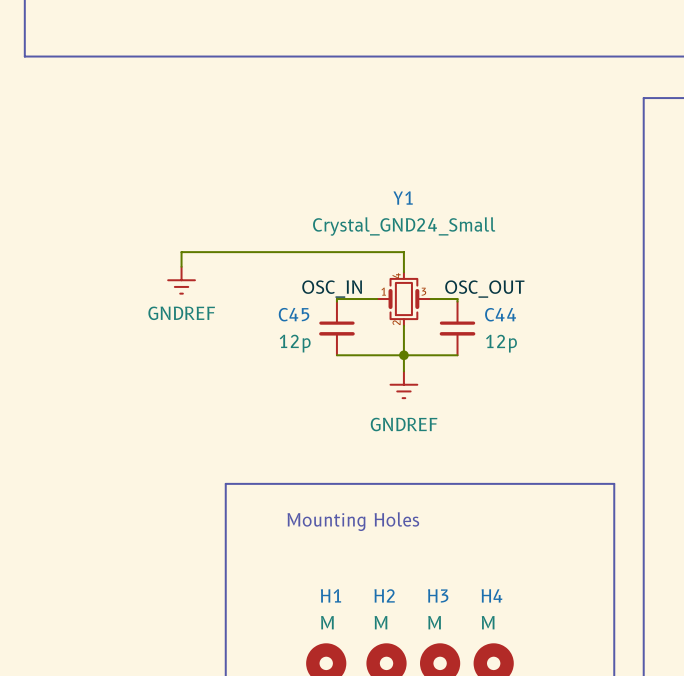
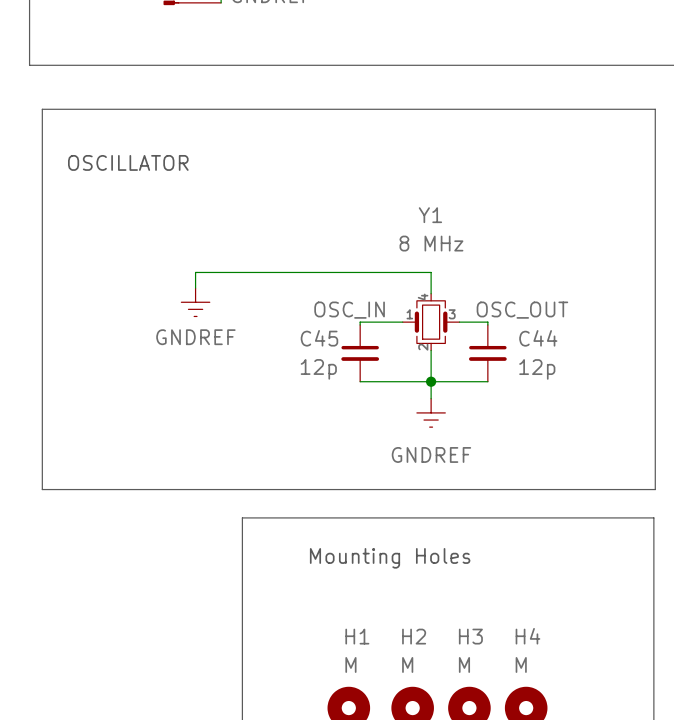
line: none -> (42, 109) (655, 109) (655, 489) (42, 489) (42, 109)
text: none -> OSCILLATOR (128, 162)
Y1 value: Crystal_GND24_Small (404, 226) -> 8 MHz (431, 243)

